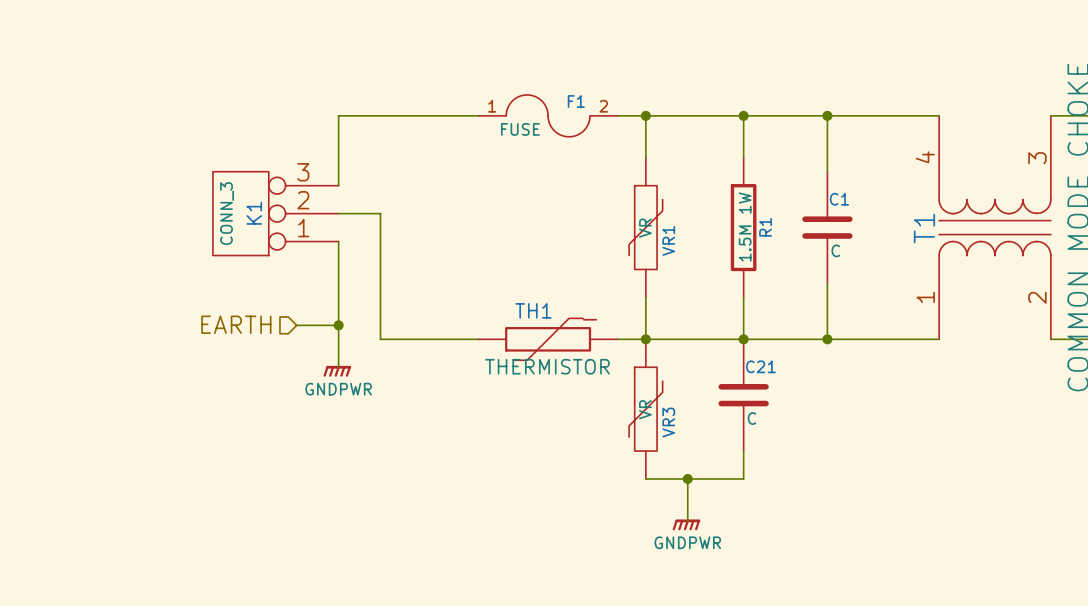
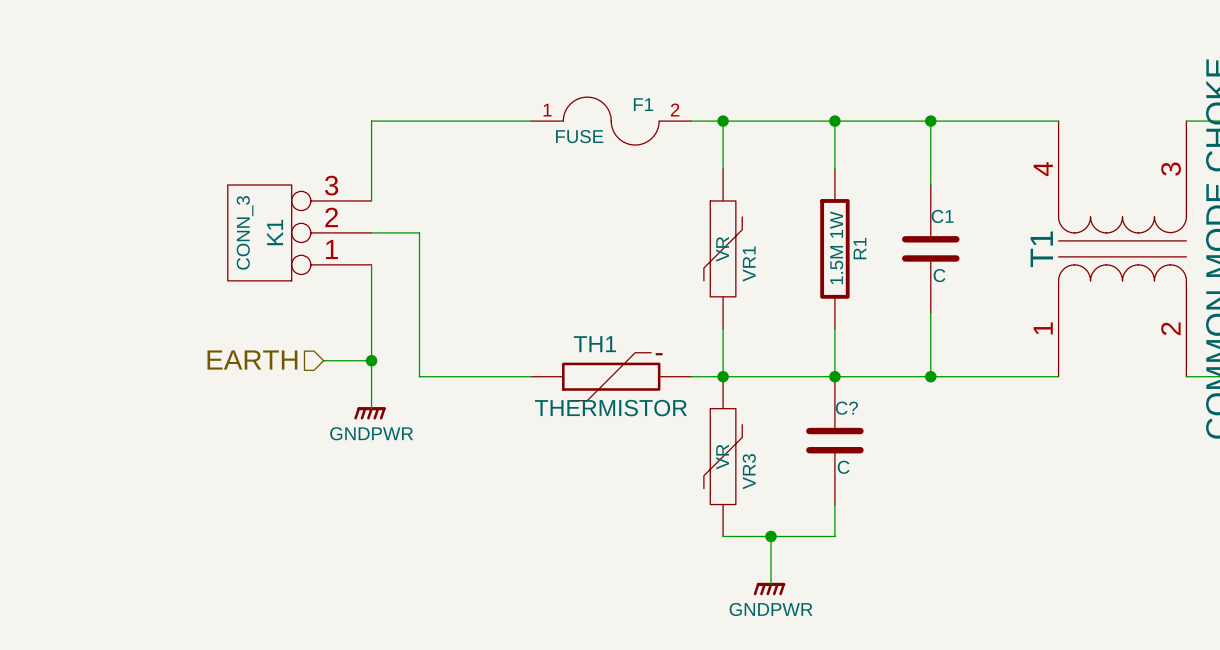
C21 name: C21 (760, 366) -> C? (846, 408)

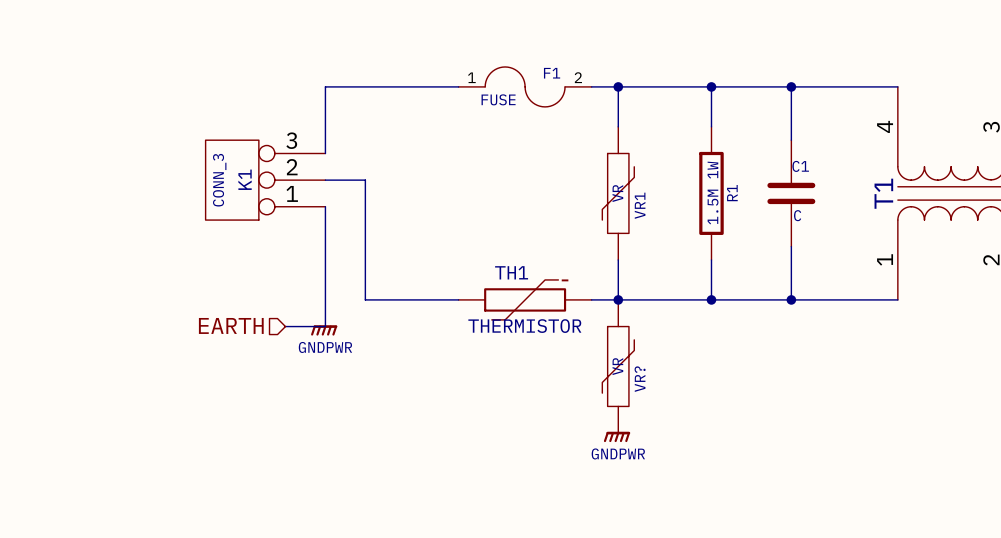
hierarchical label position: EARTH (252, 360) -> EARTH (231, 325)
wire: (323, 360) (371, 360) -> (285, 326) (325, 326)
junction: (371, 360) -> none
C?: C (834, 440) -> none
VR3 name: VR3 (749, 471) -> VR? (640, 379)
wire: (834, 504) (834, 536) (723, 536) -> none
wire: (771, 536) (771, 584) -> none
junction: (771, 536) -> none
power symbol position: GNDPWR (769, 589) -> GNDPWR (617, 436)

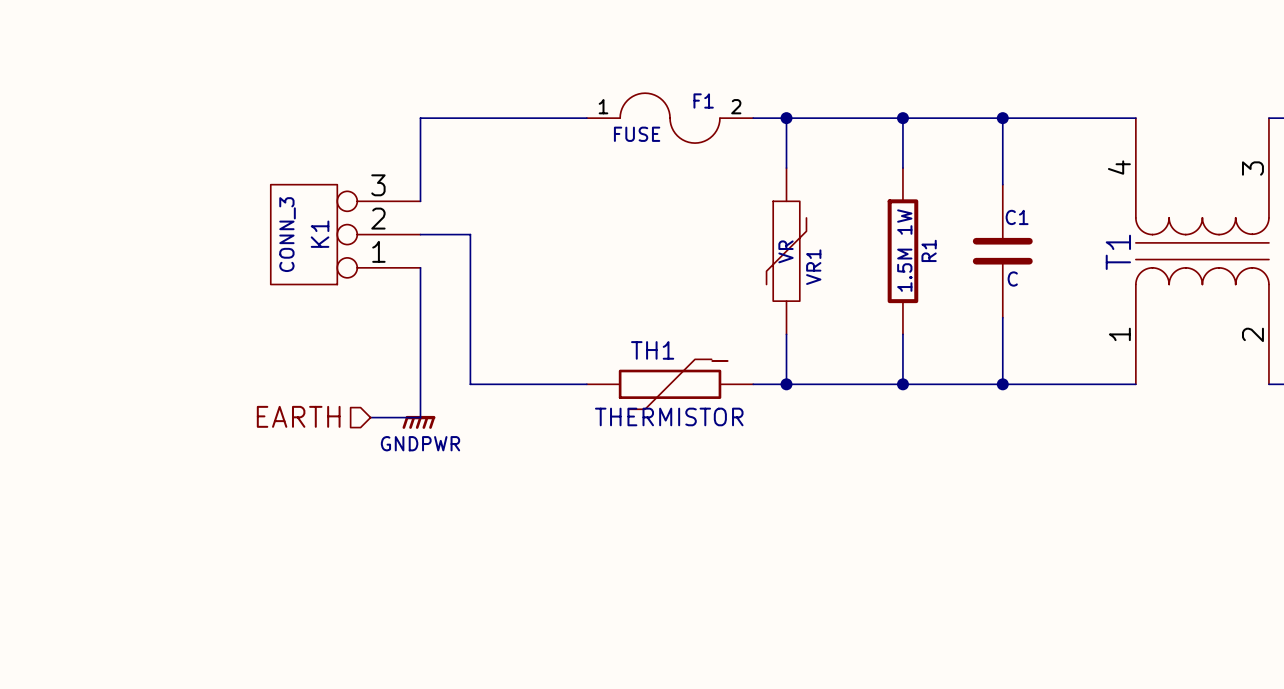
VR?: VR (618, 366) -> none
power symbol: GNDPWR (617, 436) -> none

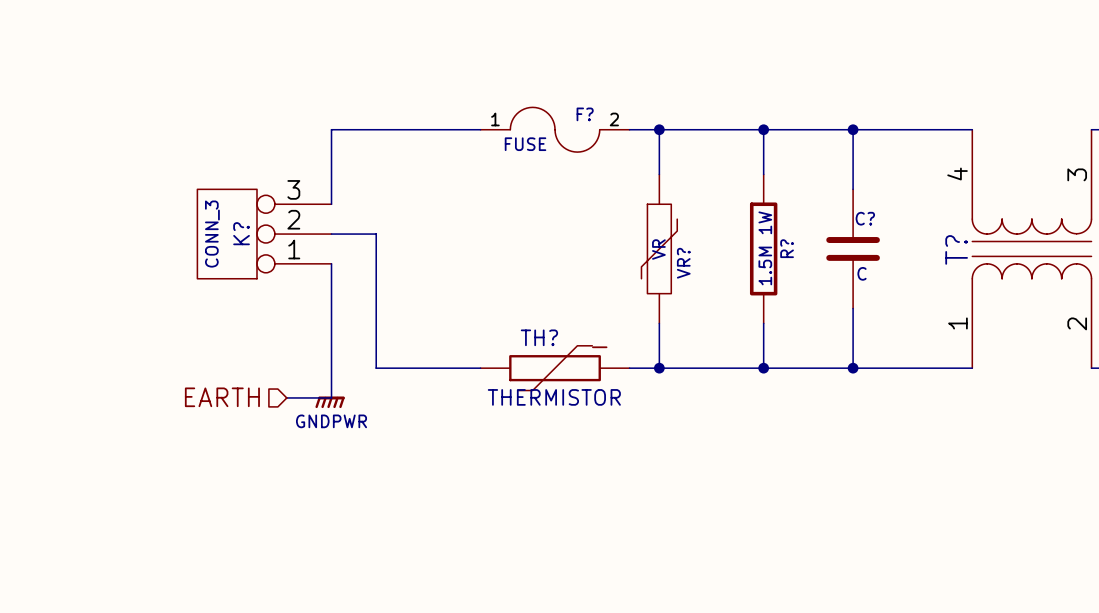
F1 name: F1 (703, 101) -> F? (585, 114)
C1 name: C1 (1017, 217) -> C? (865, 218)
K1 name: K1 (320, 234) -> K? (241, 233)
R1 name: R1 (929, 250) -> R? (787, 248)
T1 name: T1 (1118, 252) -> T? (956, 249)
VR1 name: VR1 (813, 267) -> VR? (683, 263)
TH1 name: TH1 (652, 350) -> TH? (539, 337)

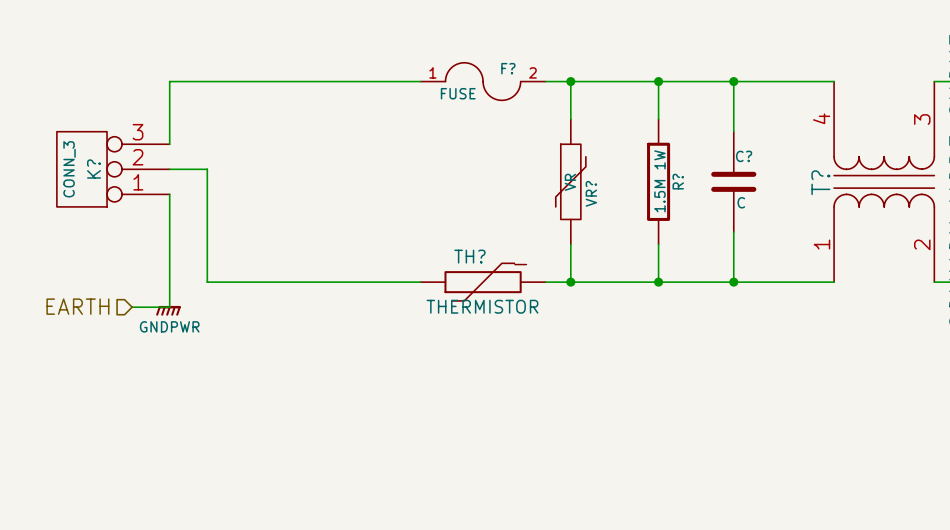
wire: (331, 129) (331, 204) -> (295, 81) (169, 81) (169, 144)
K? position: (264, 234) -> (113, 169)
wire: (331, 234) (376, 234) (376, 368) -> (169, 169) (207, 169) (207, 282) (332, 282)
wire: (331, 263) (331, 397) (286, 397) -> (169, 194) (169, 307) (132, 307)
hierarchical label position: EARTH (222, 397) -> EARTH (77, 306)
power symbol position: GNDPWR (330, 402) -> GNDPWR (168, 310)

